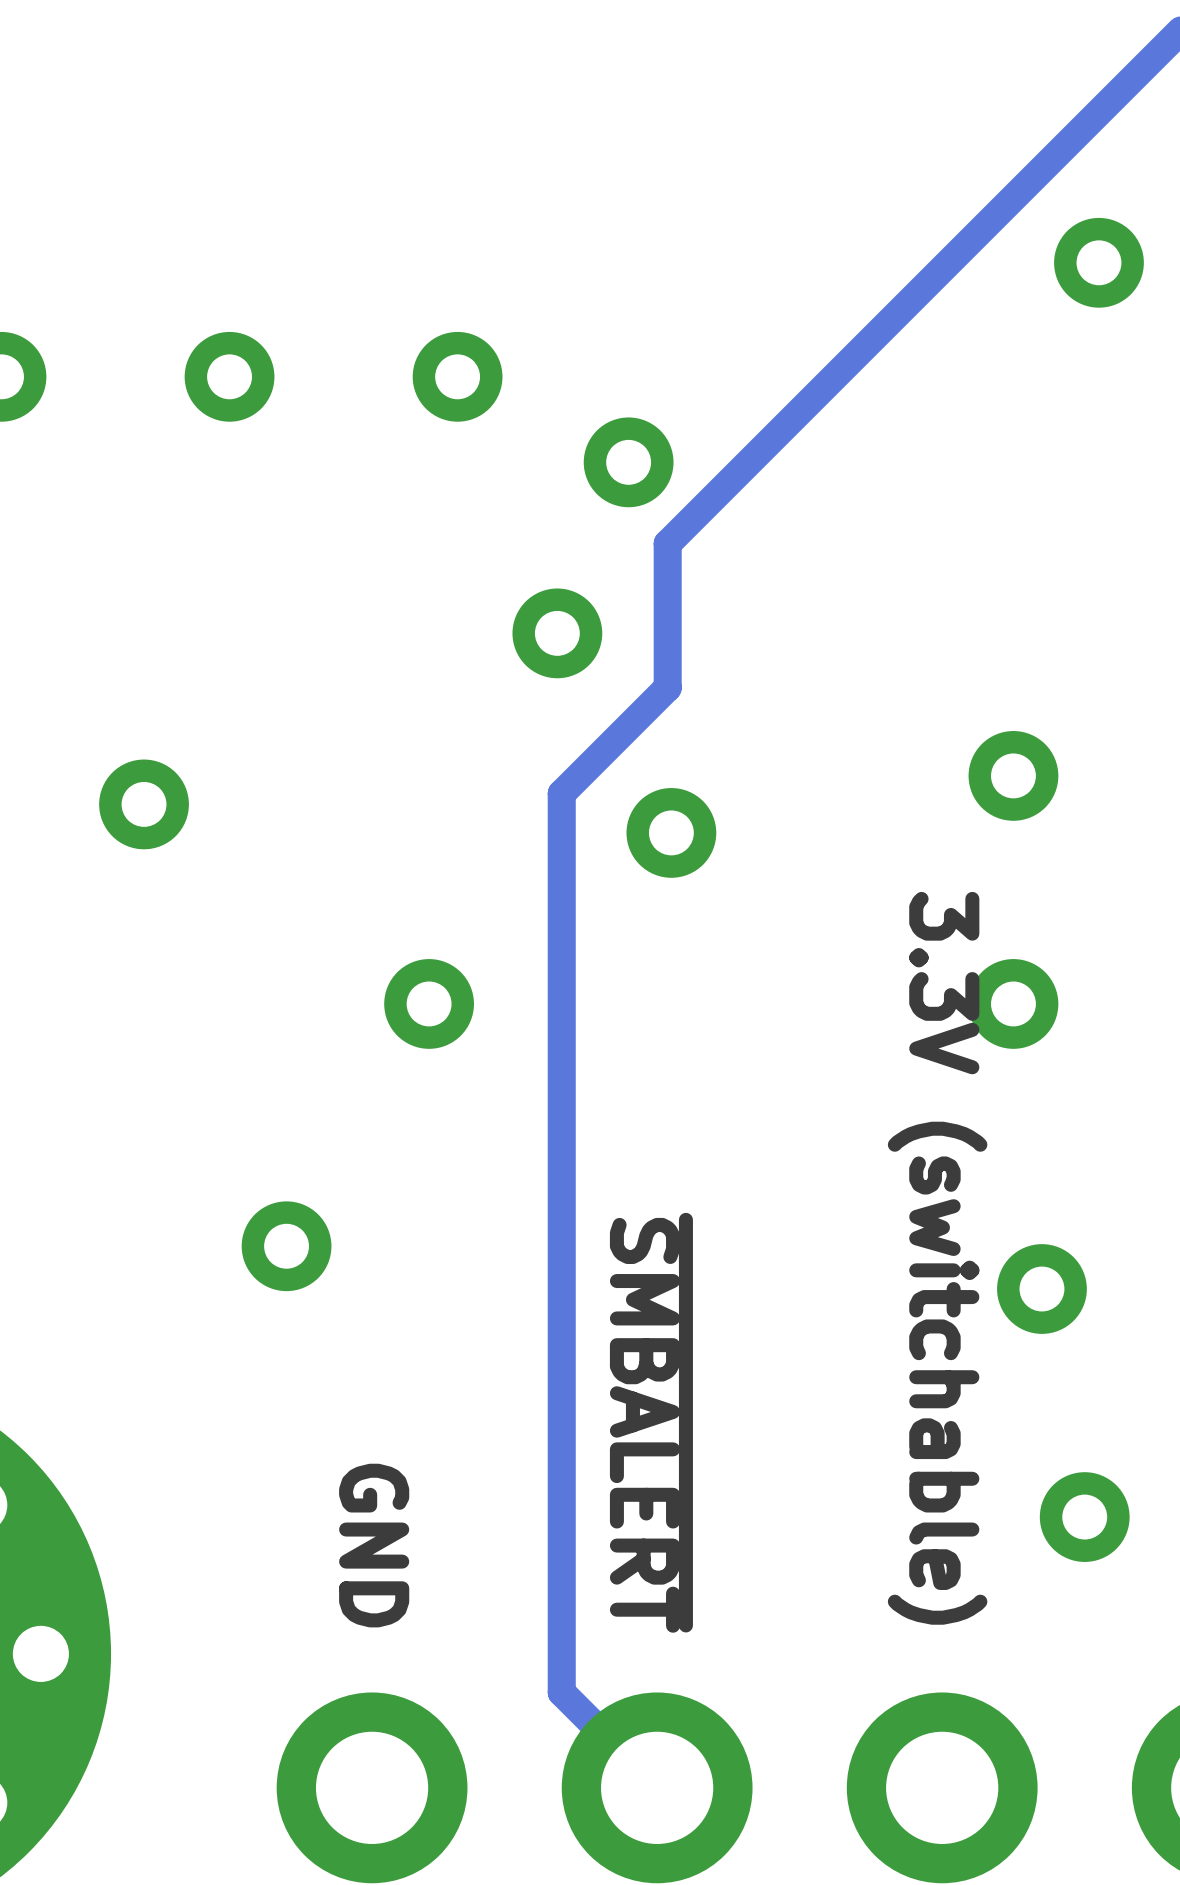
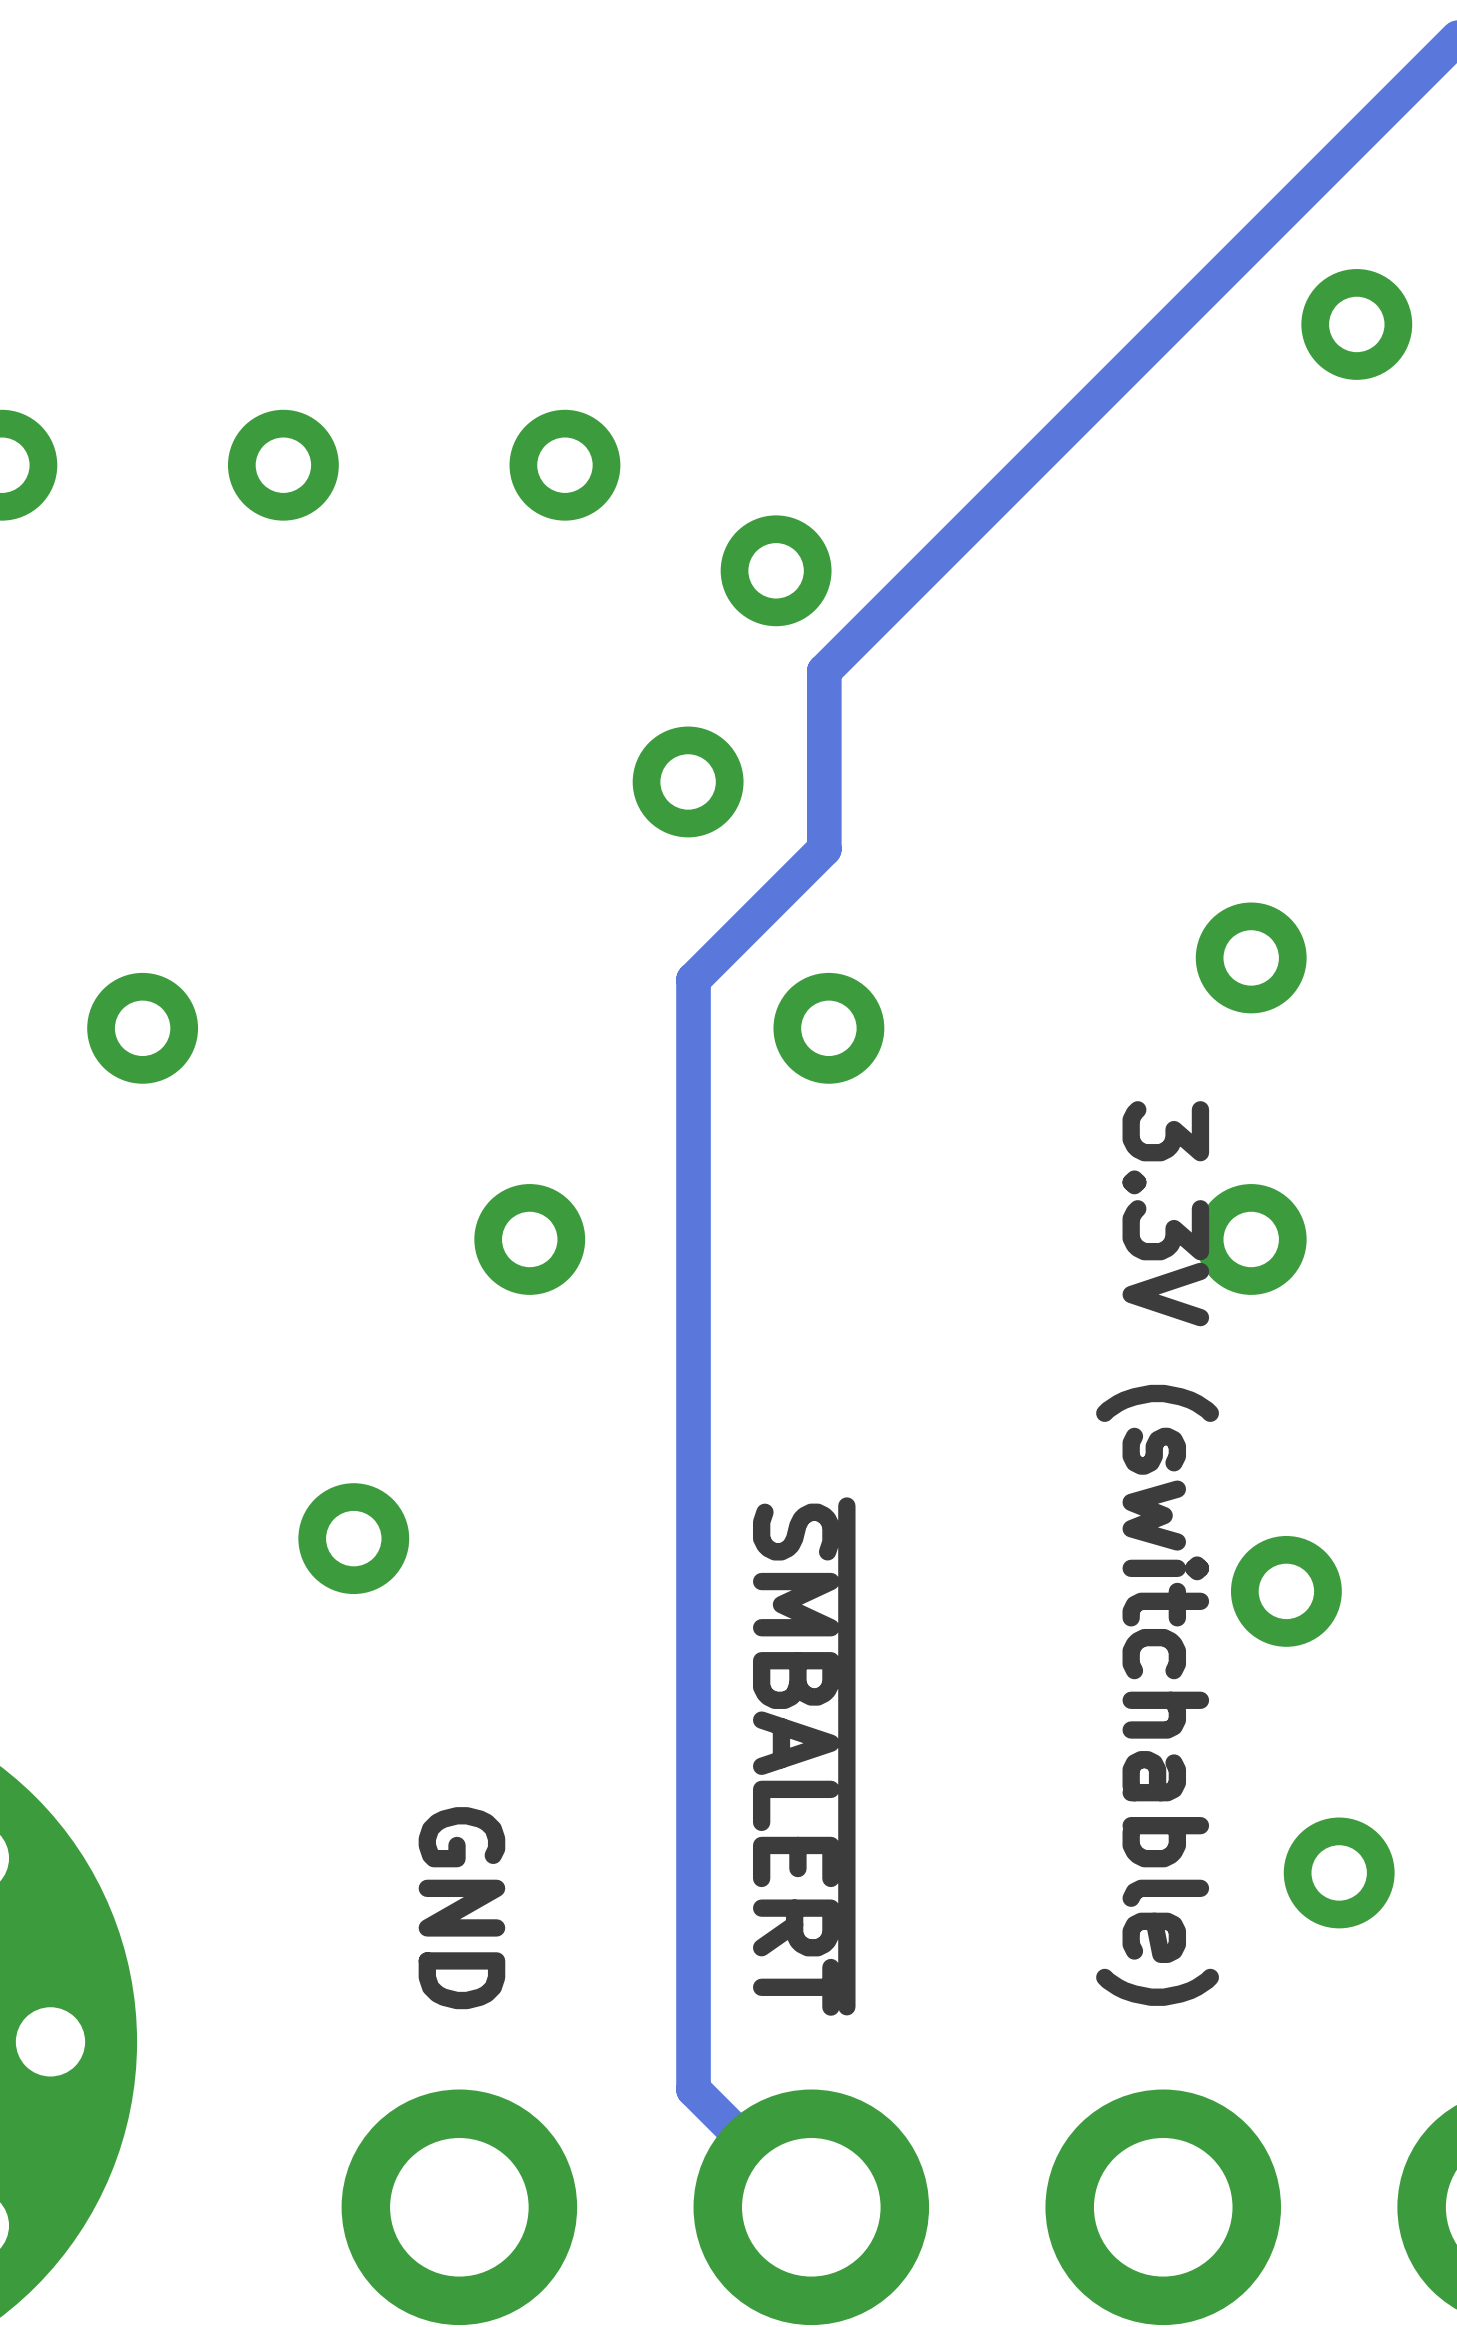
via position: (144, 804) -> (142, 1028)

